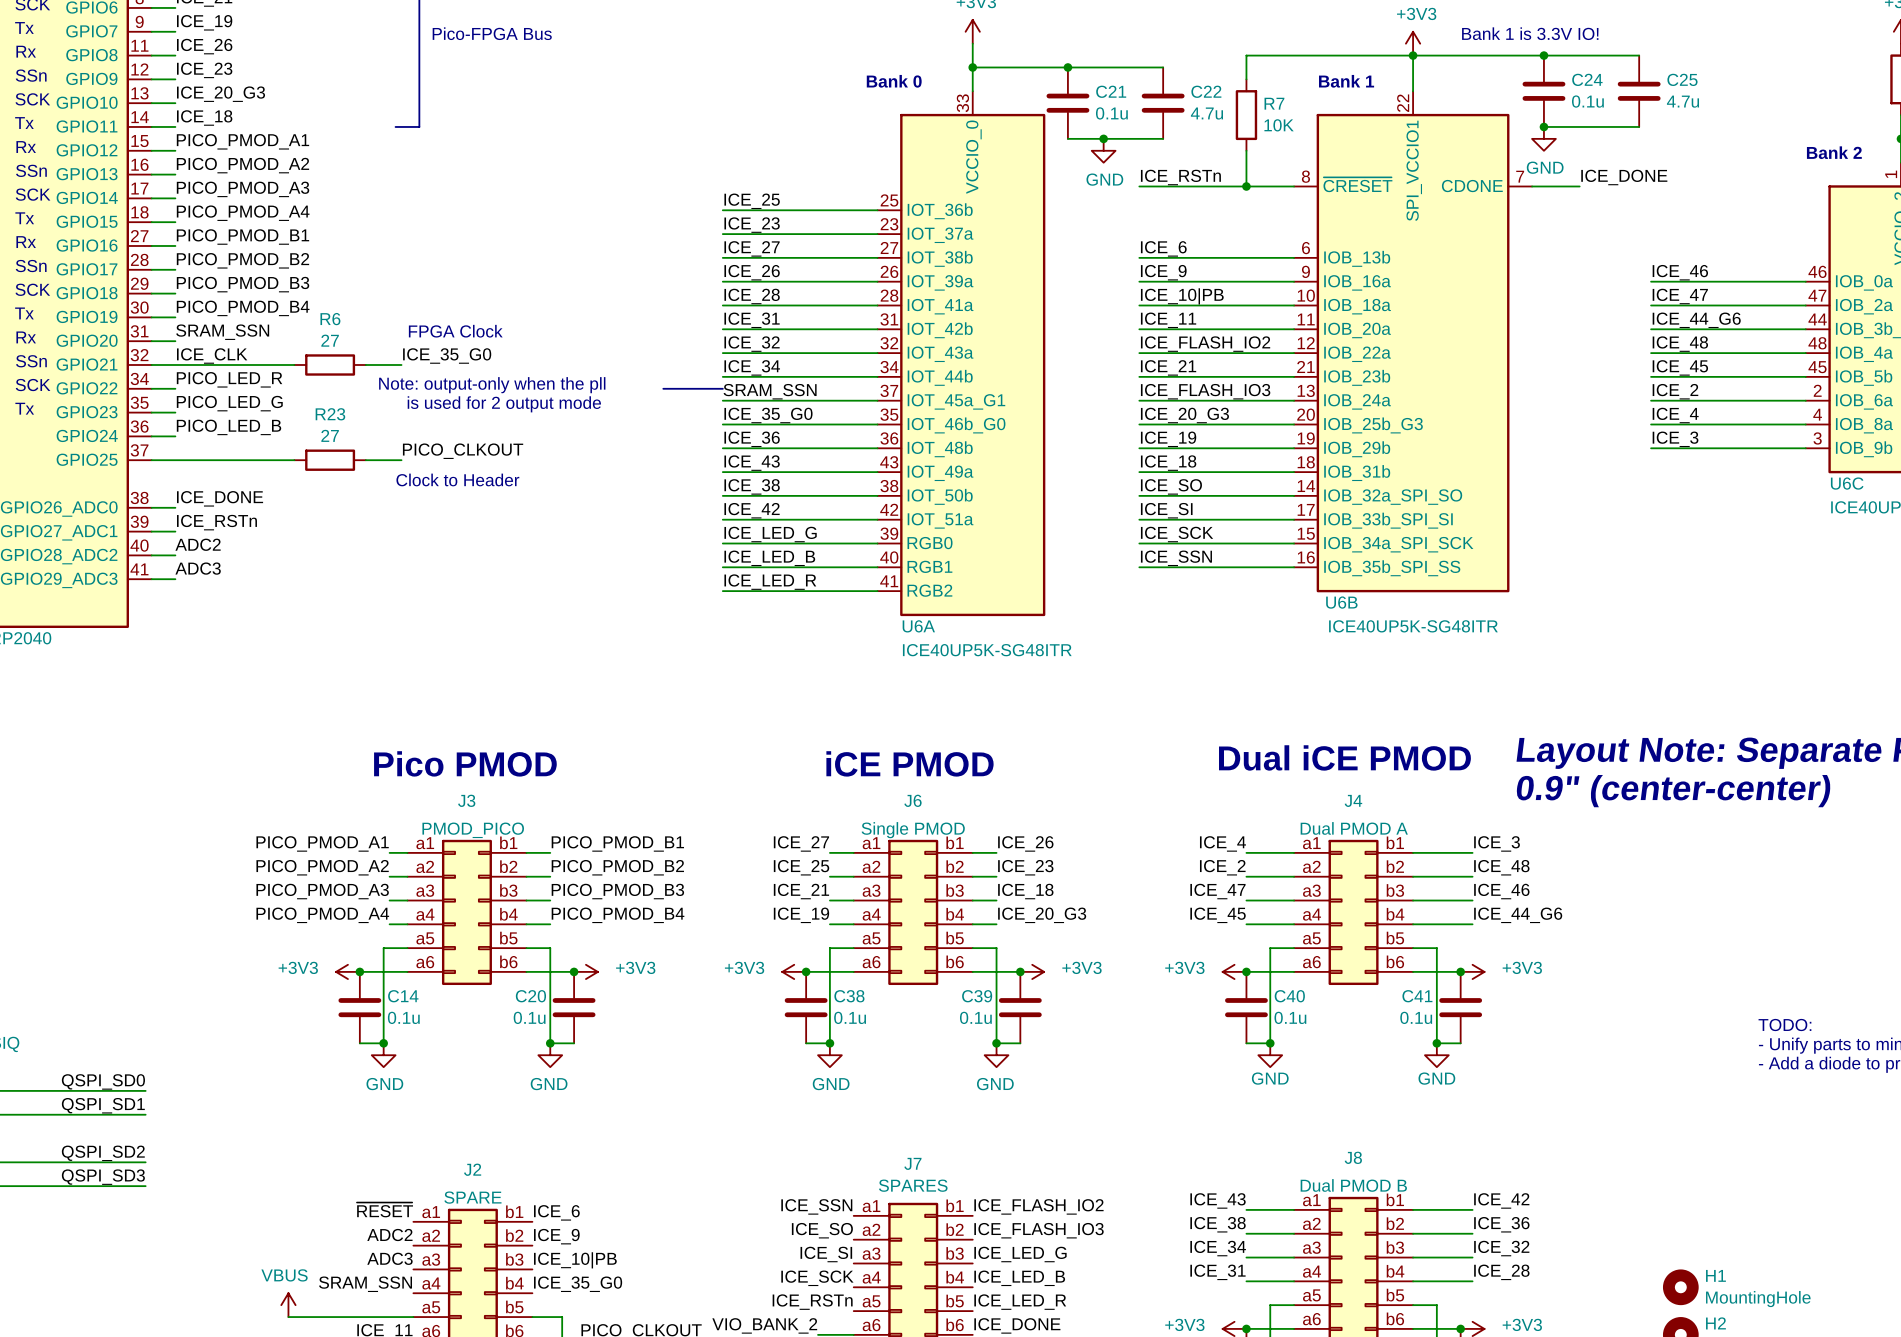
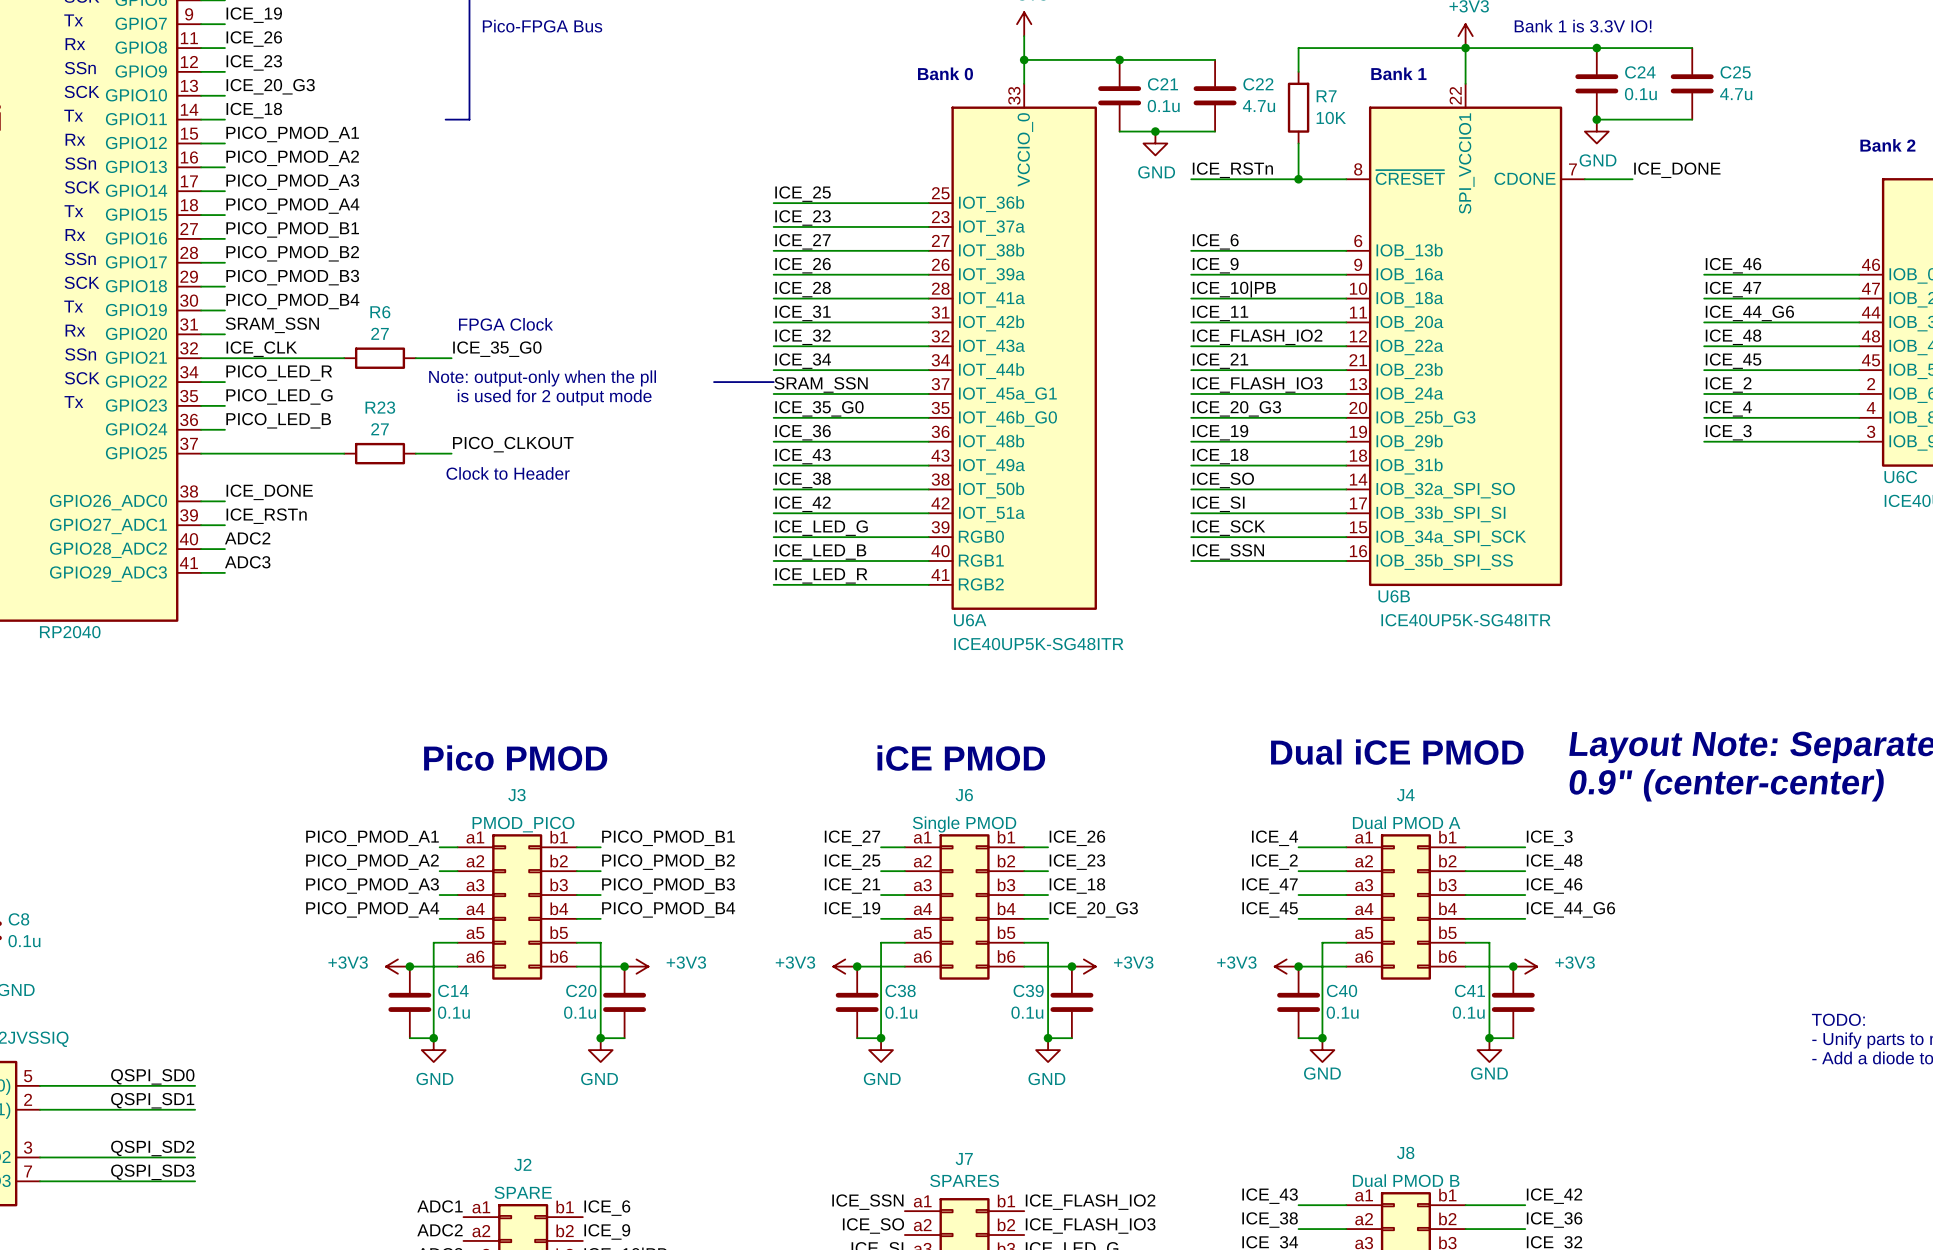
label: ~{RESET} (384, 1209) -> ADC1 (439, 1206)

